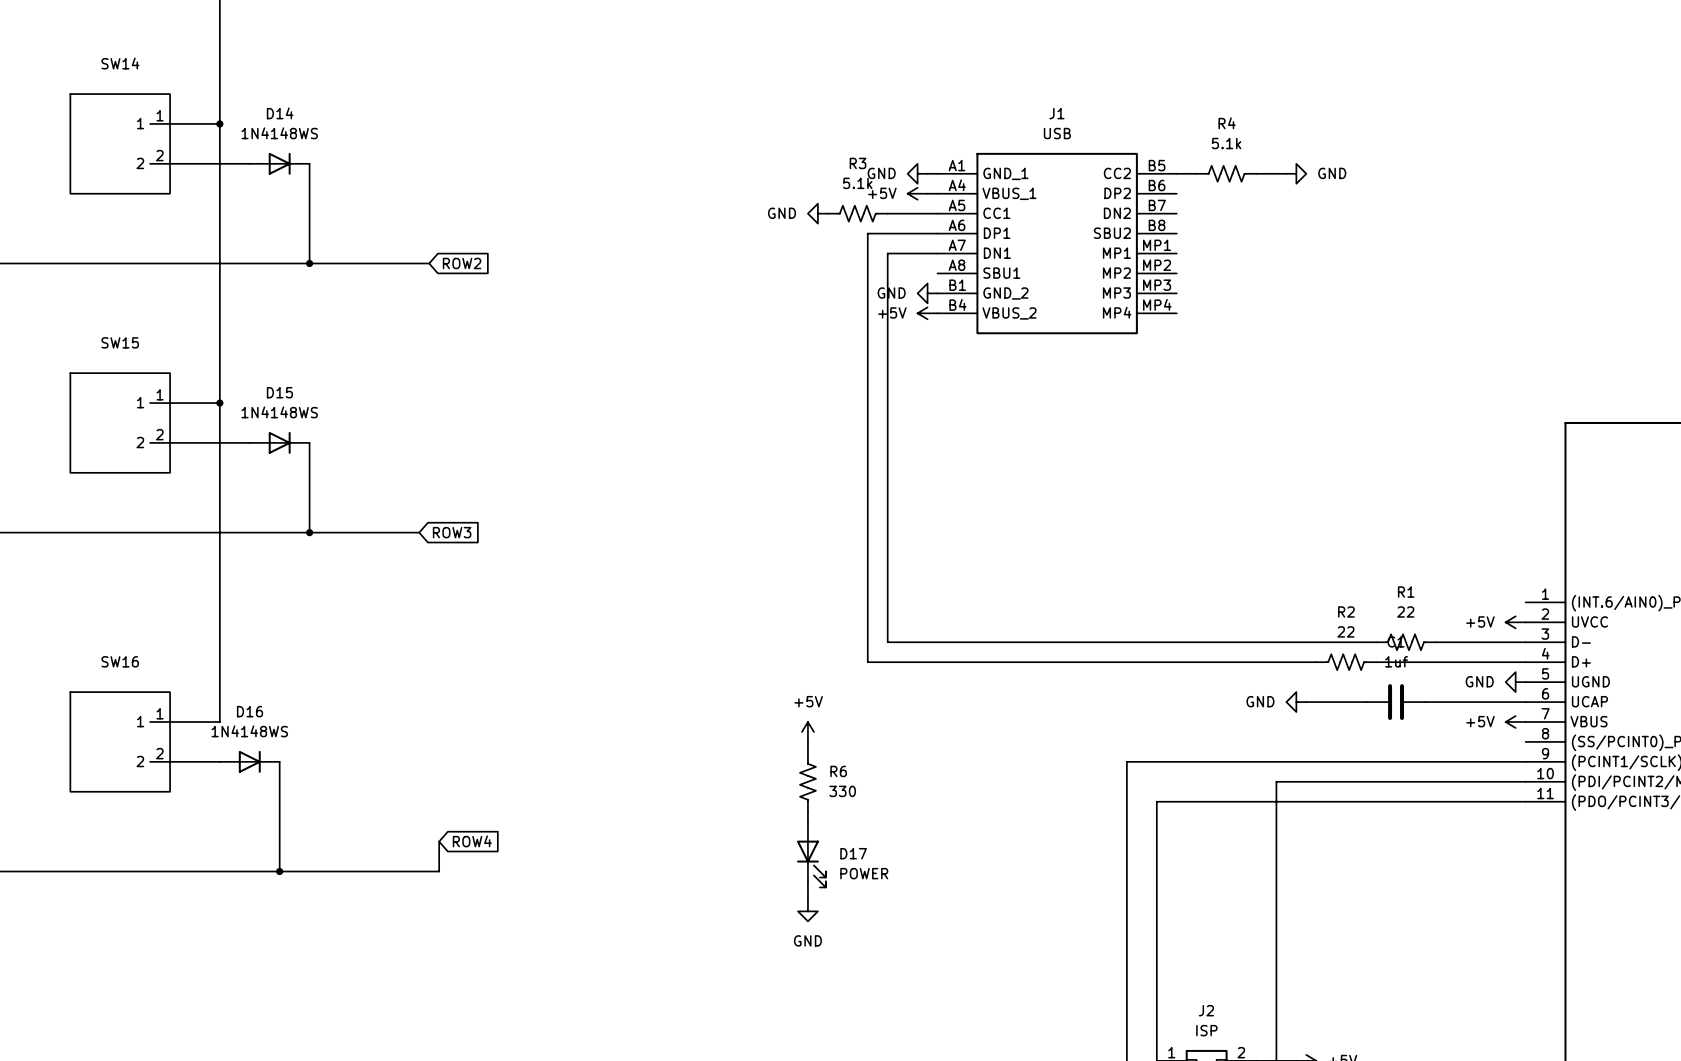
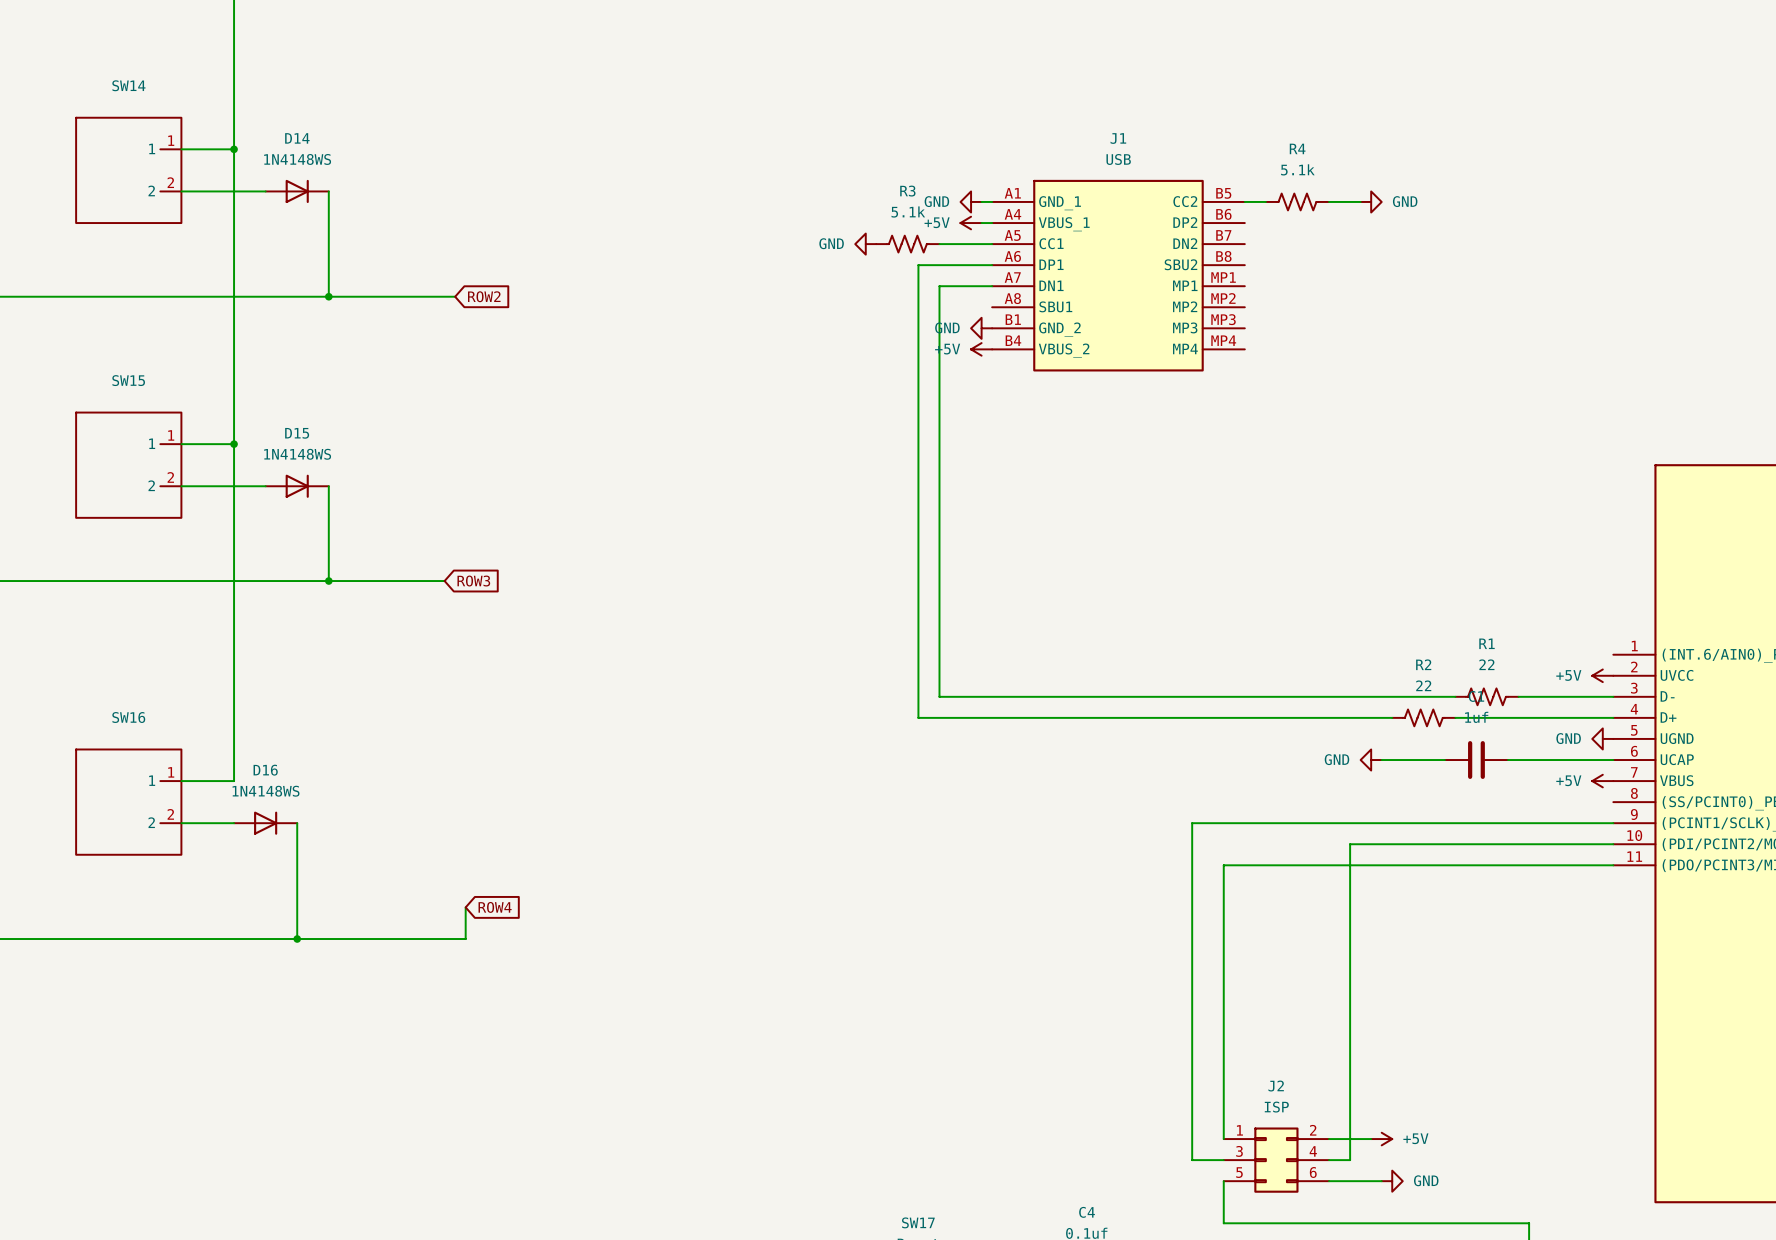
power symbol: +5V (807, 731) -> none
wire: (807, 741) (807, 751) -> none
R6: 330 (807, 781) -> none
wire: (807, 811) (807, 821) -> none
D17: POWER (811, 854) -> none
wire: (807, 881) (807, 901) -> none
power symbol: GND (807, 911) -> none

